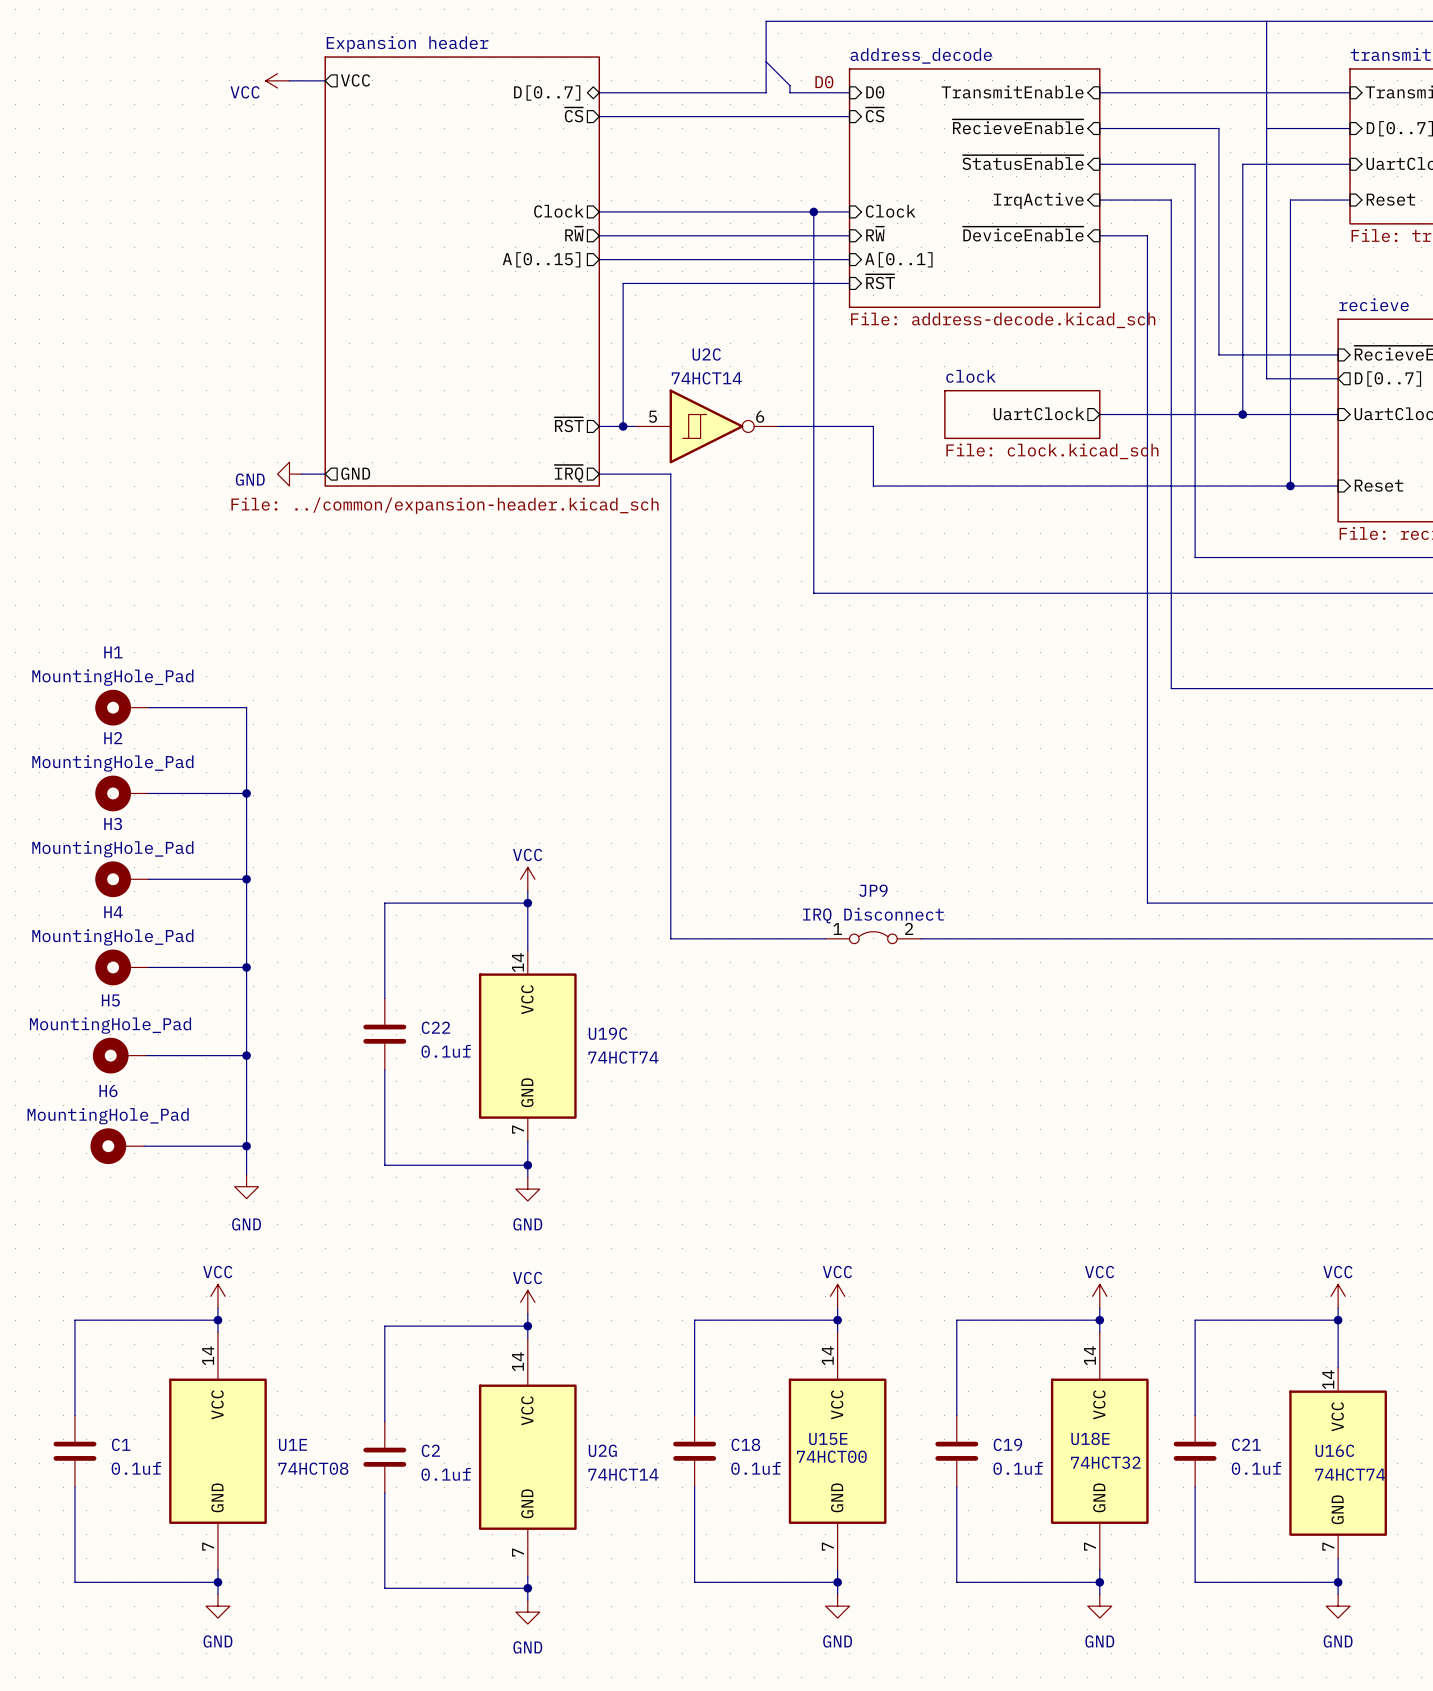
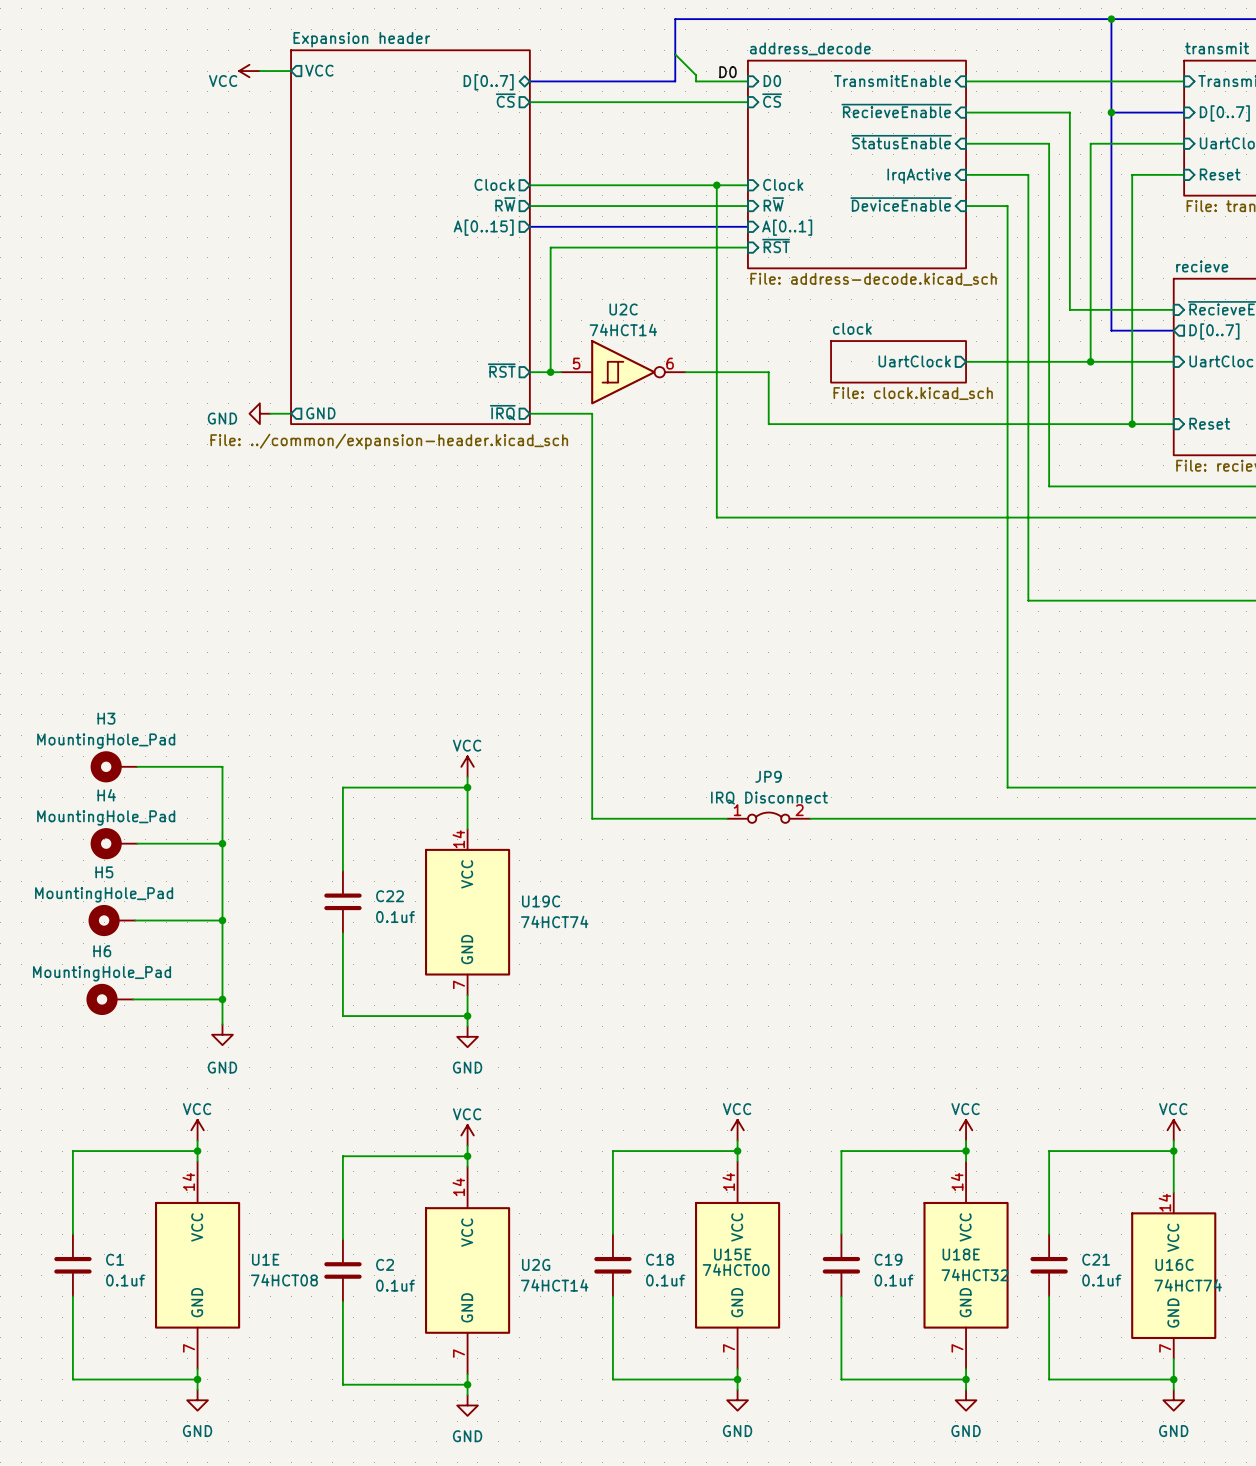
junction: none -> (1111, 19)
junction: none -> (1111, 112)
H1: MountingHole_Pad (122, 707) -> none
wire: (148, 707) (246, 707) (246, 879) -> none
H2: MountingHole_Pad (122, 793) -> none
wire: (148, 793) (246, 793) -> none
junction: (246, 793) -> none
junction: (246, 879) -> none

